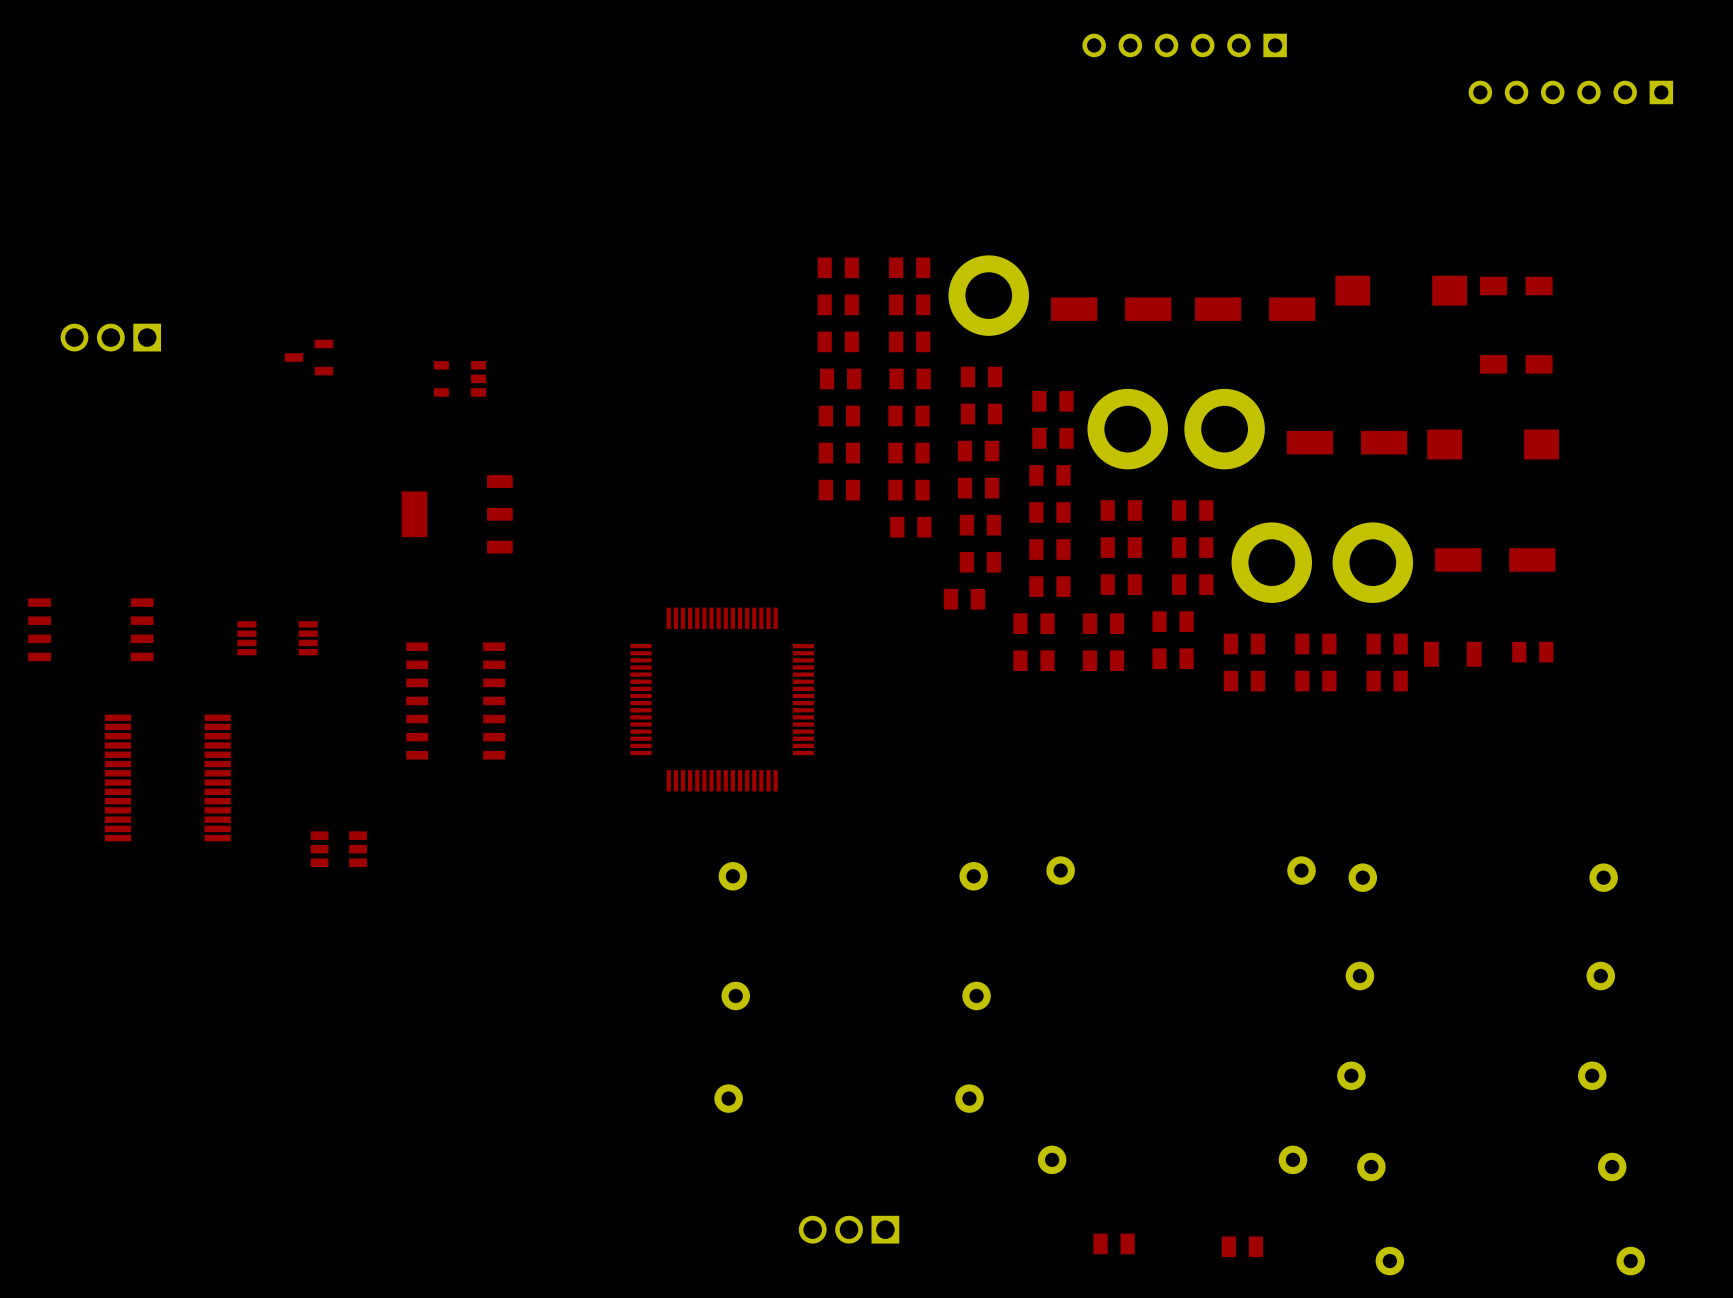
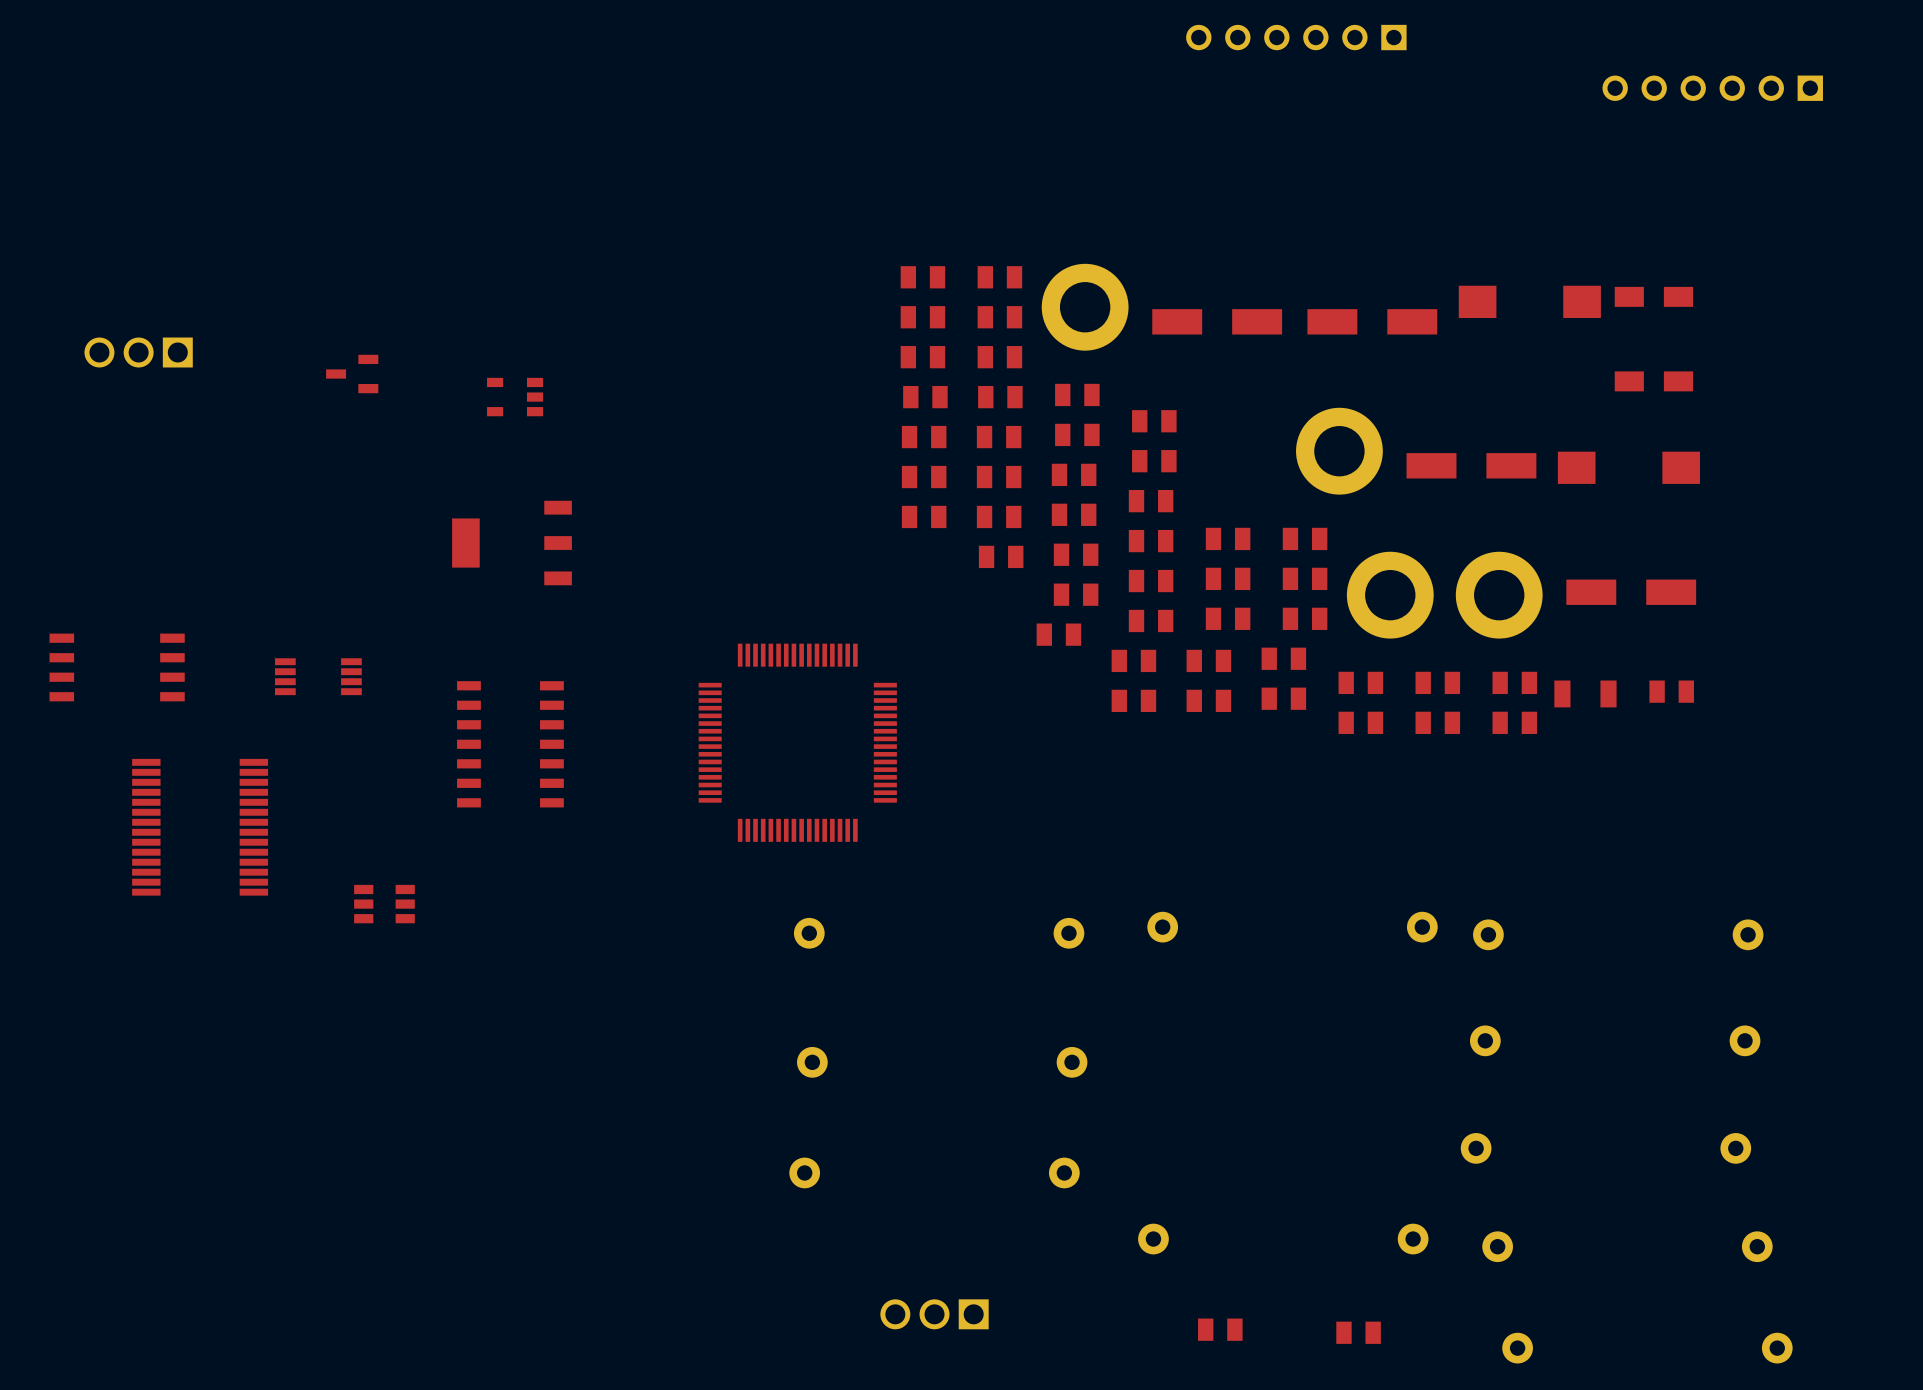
part: (1127, 429) -> none

